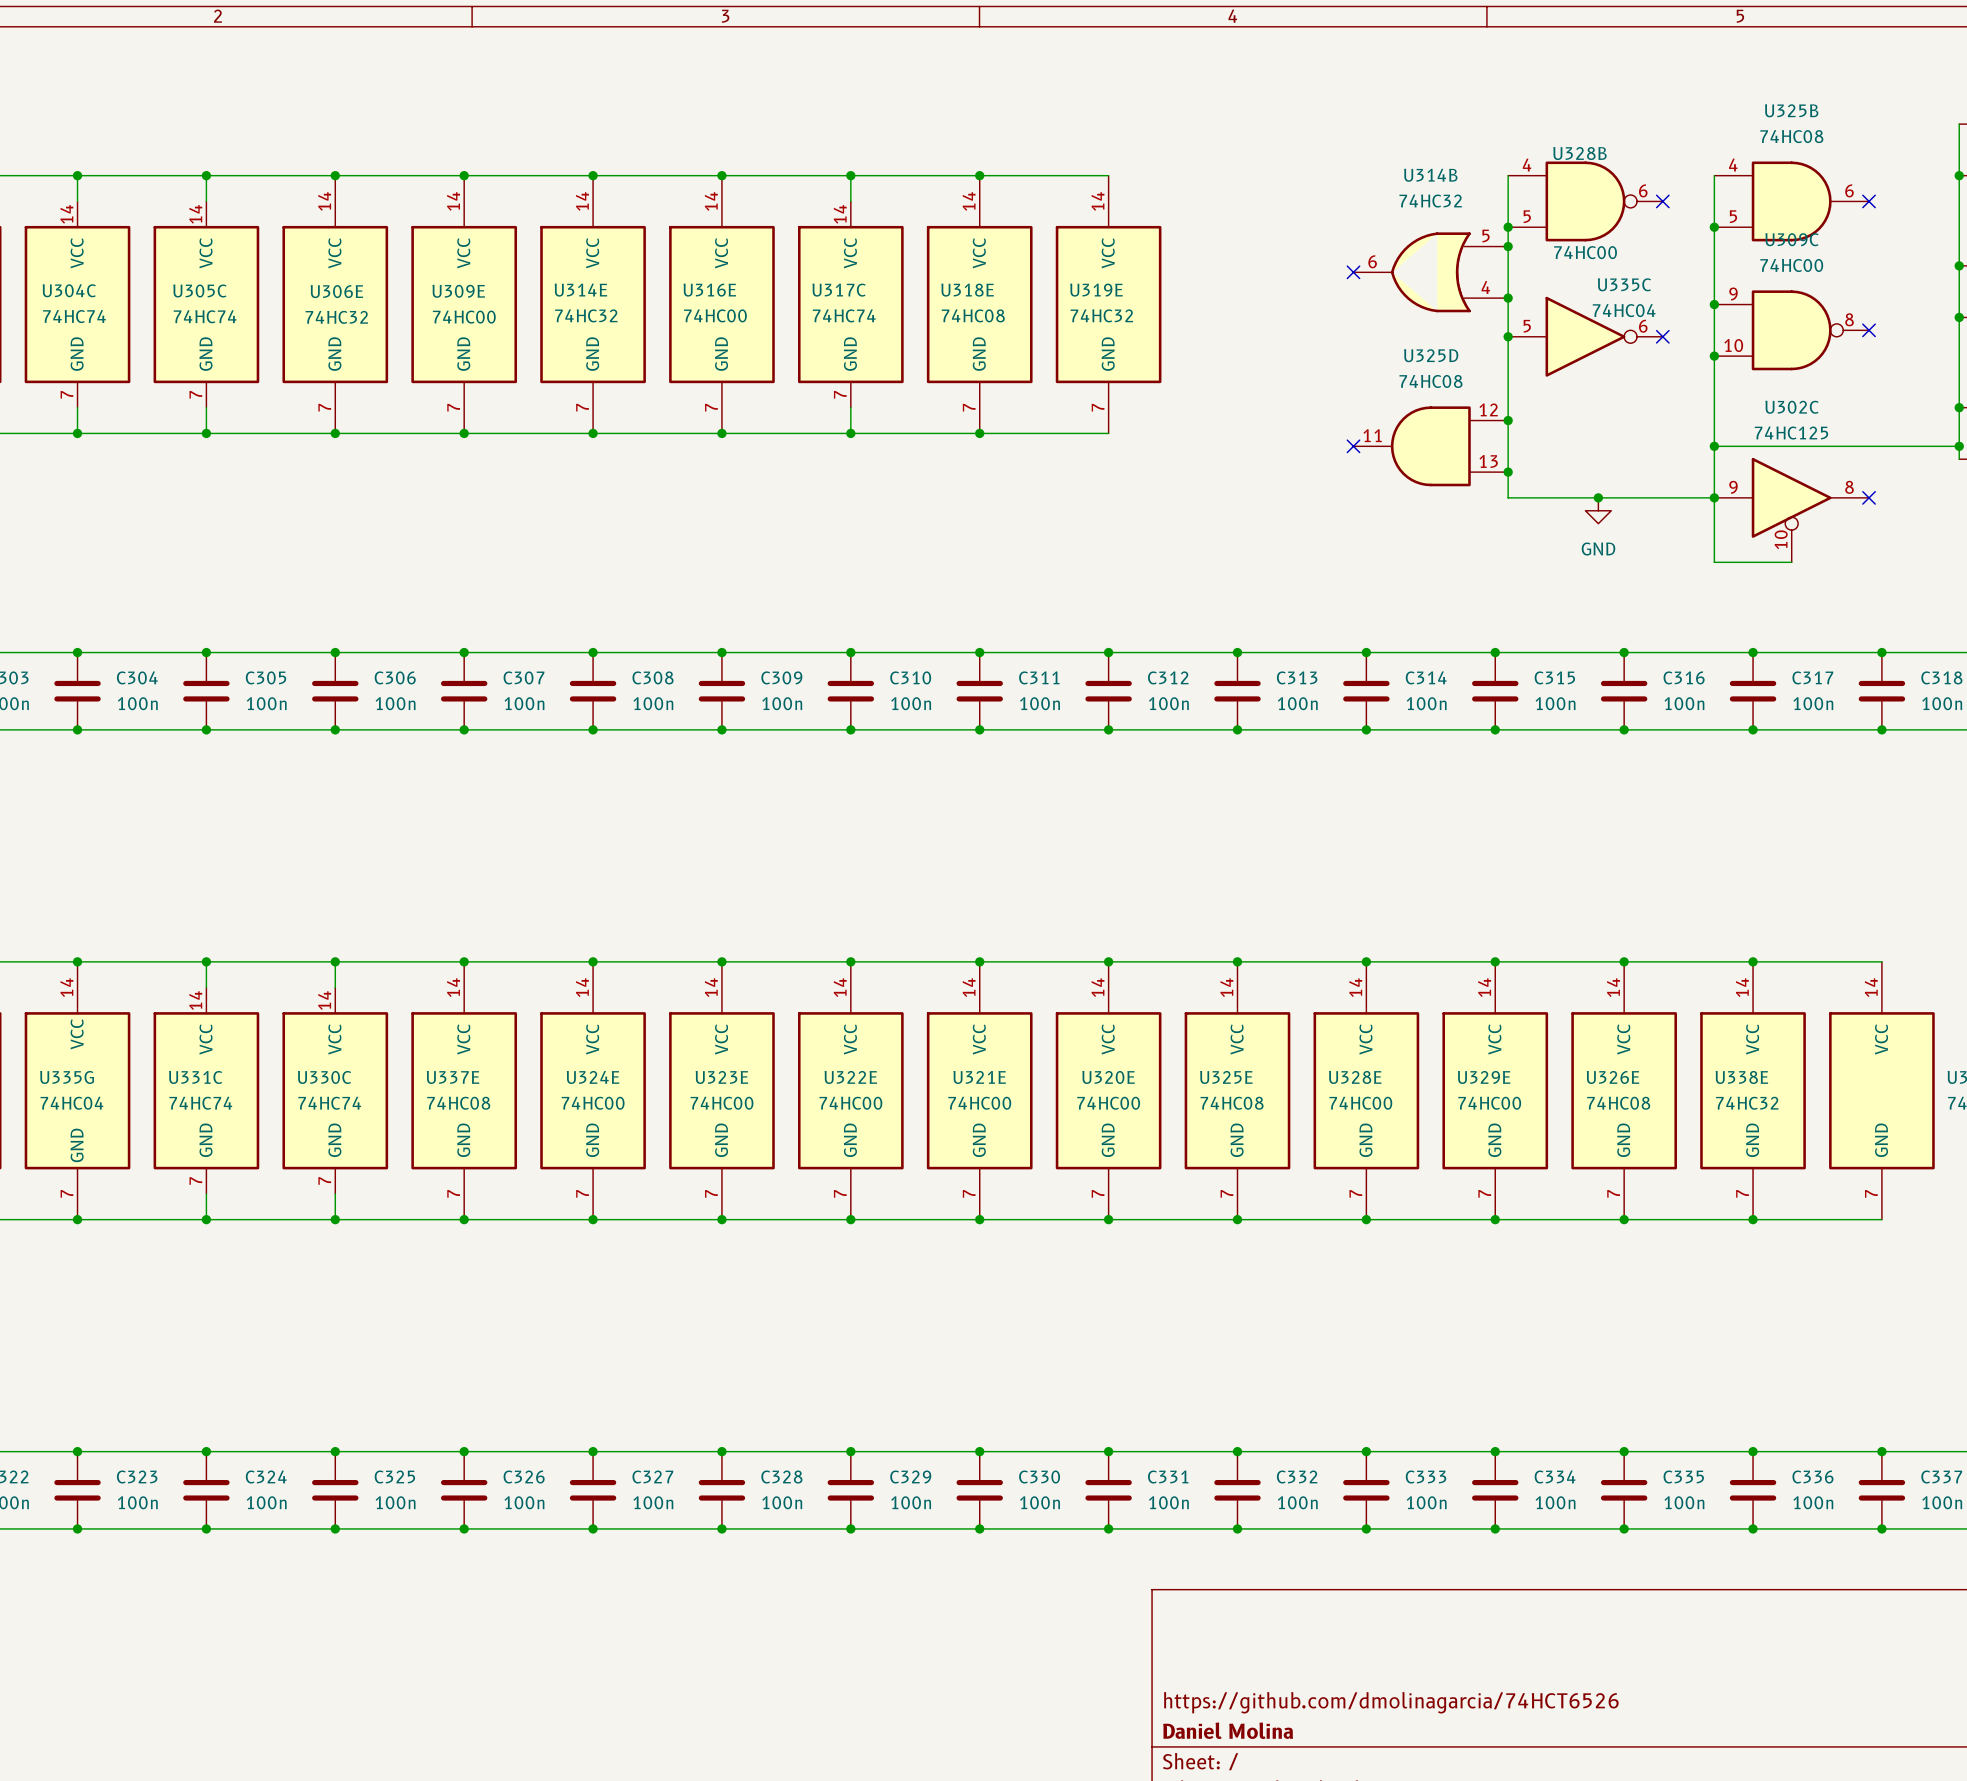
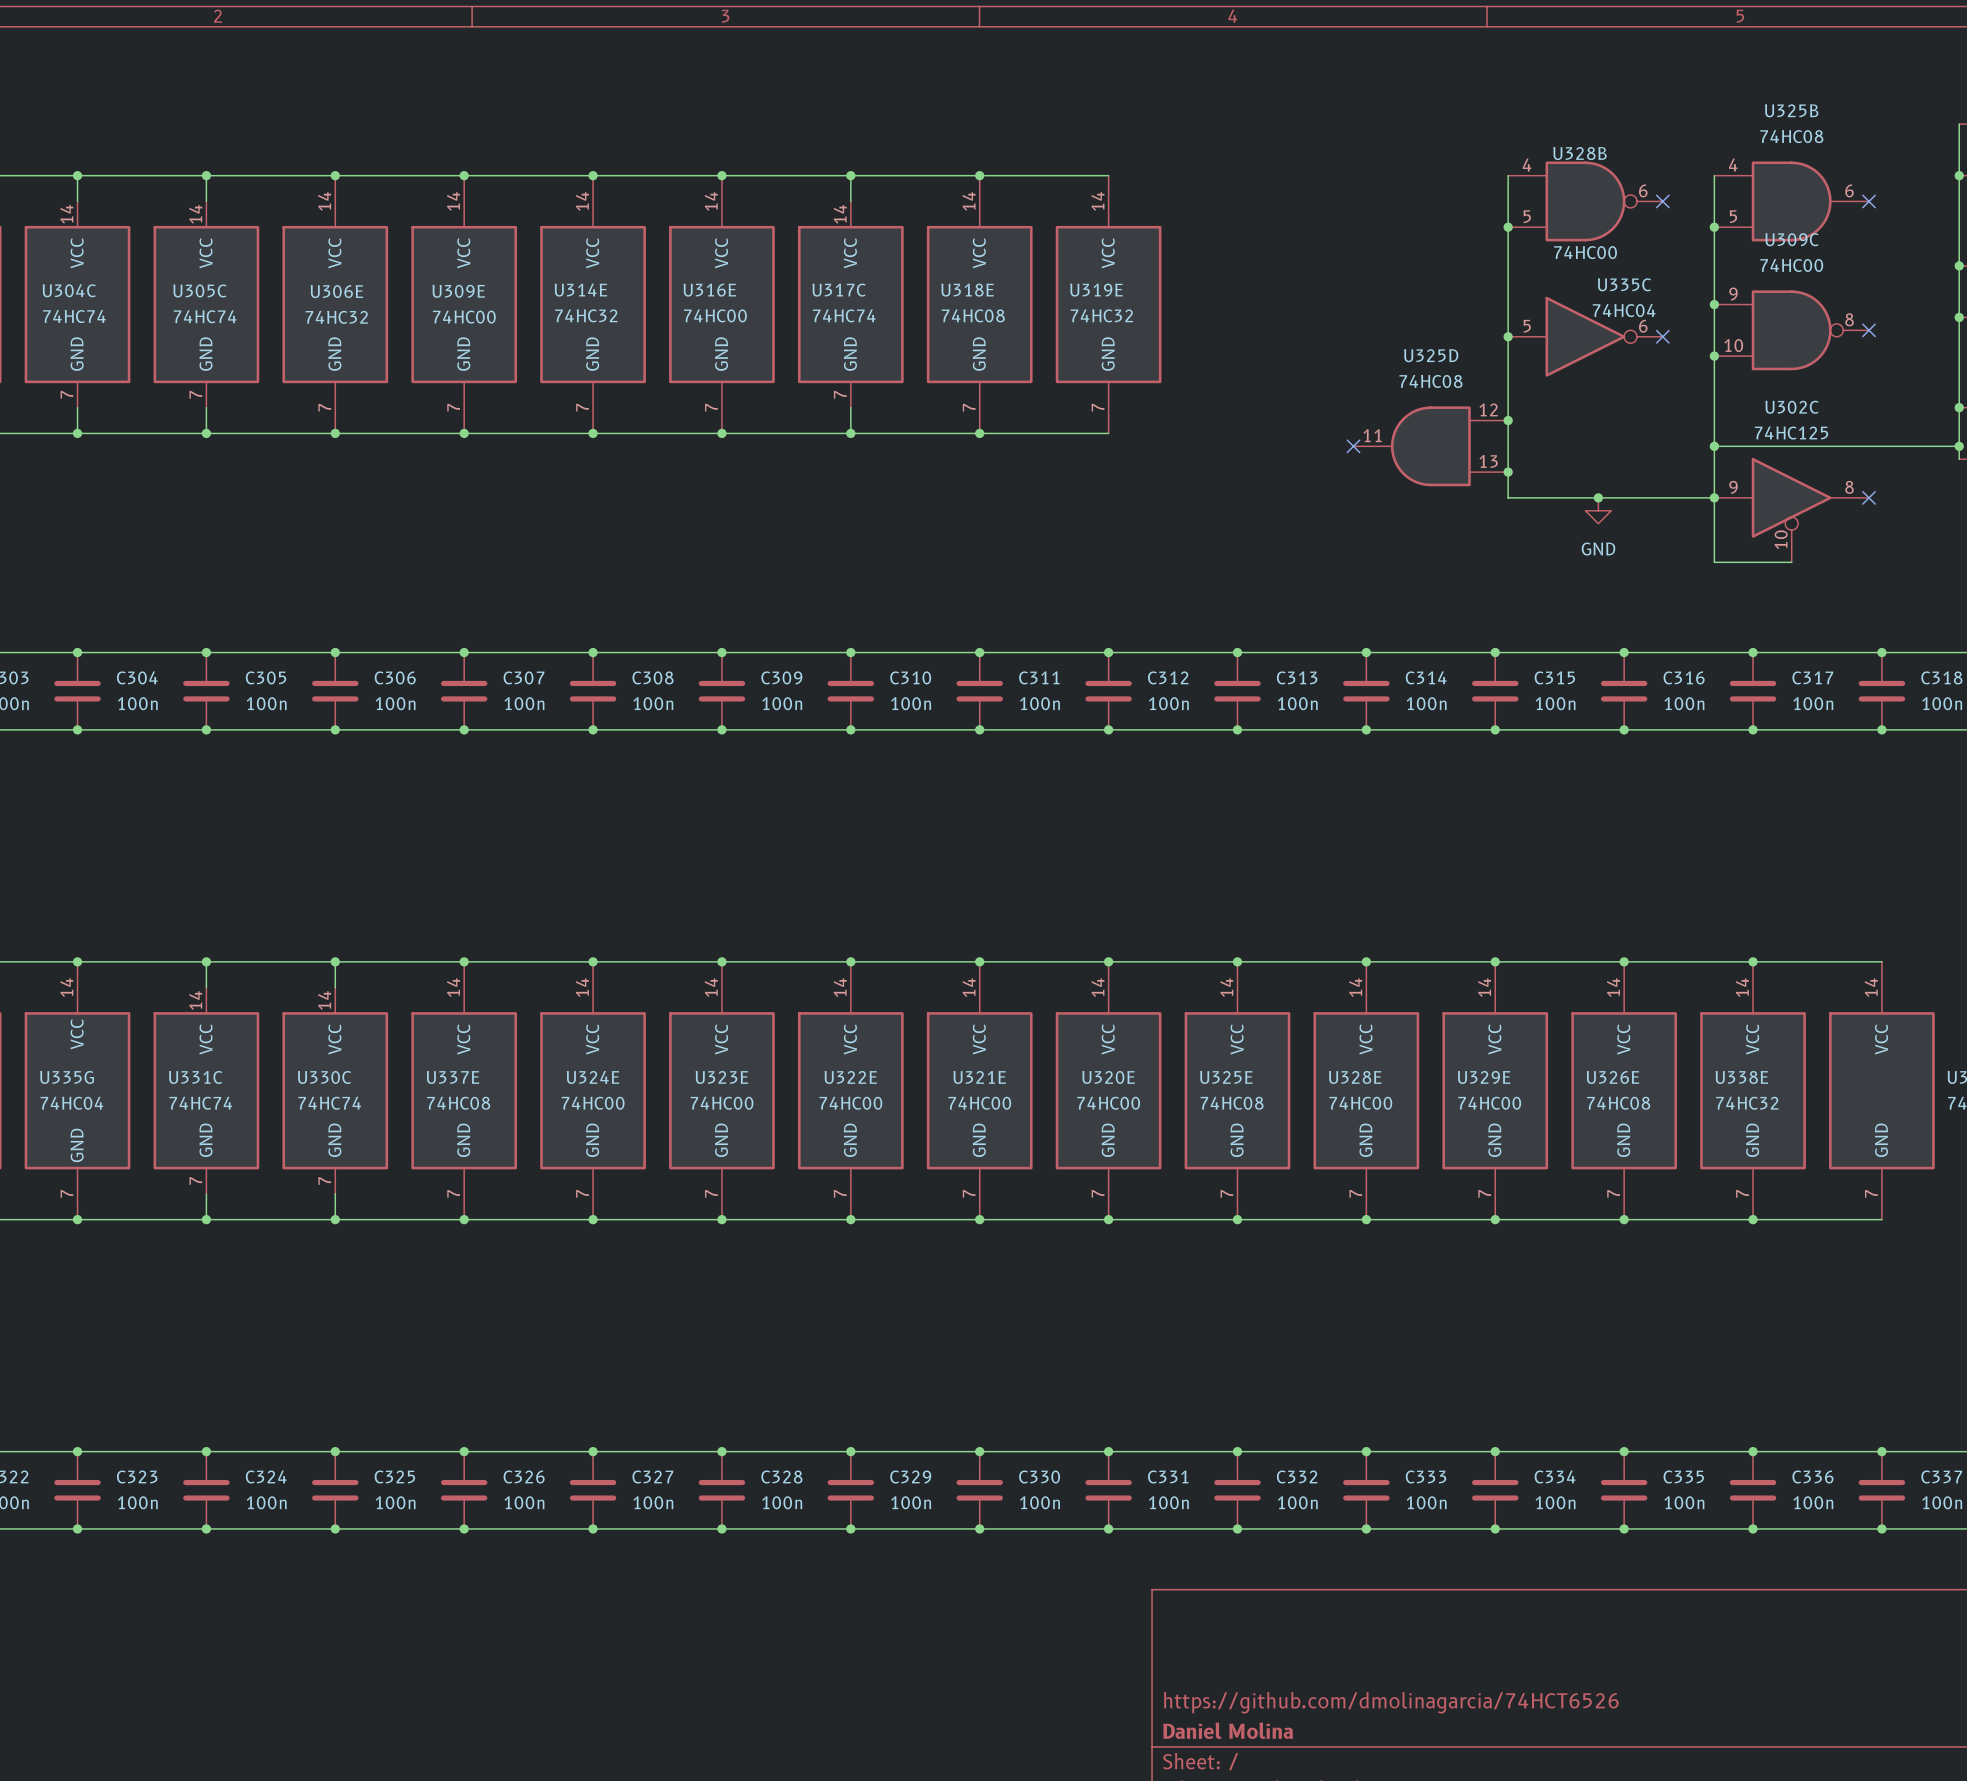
junction: (1508, 246) -> none
no-connect mark: (1353, 272) -> none
U314B: 74HC32 (1430, 272) -> none
junction: (1508, 298) -> none

